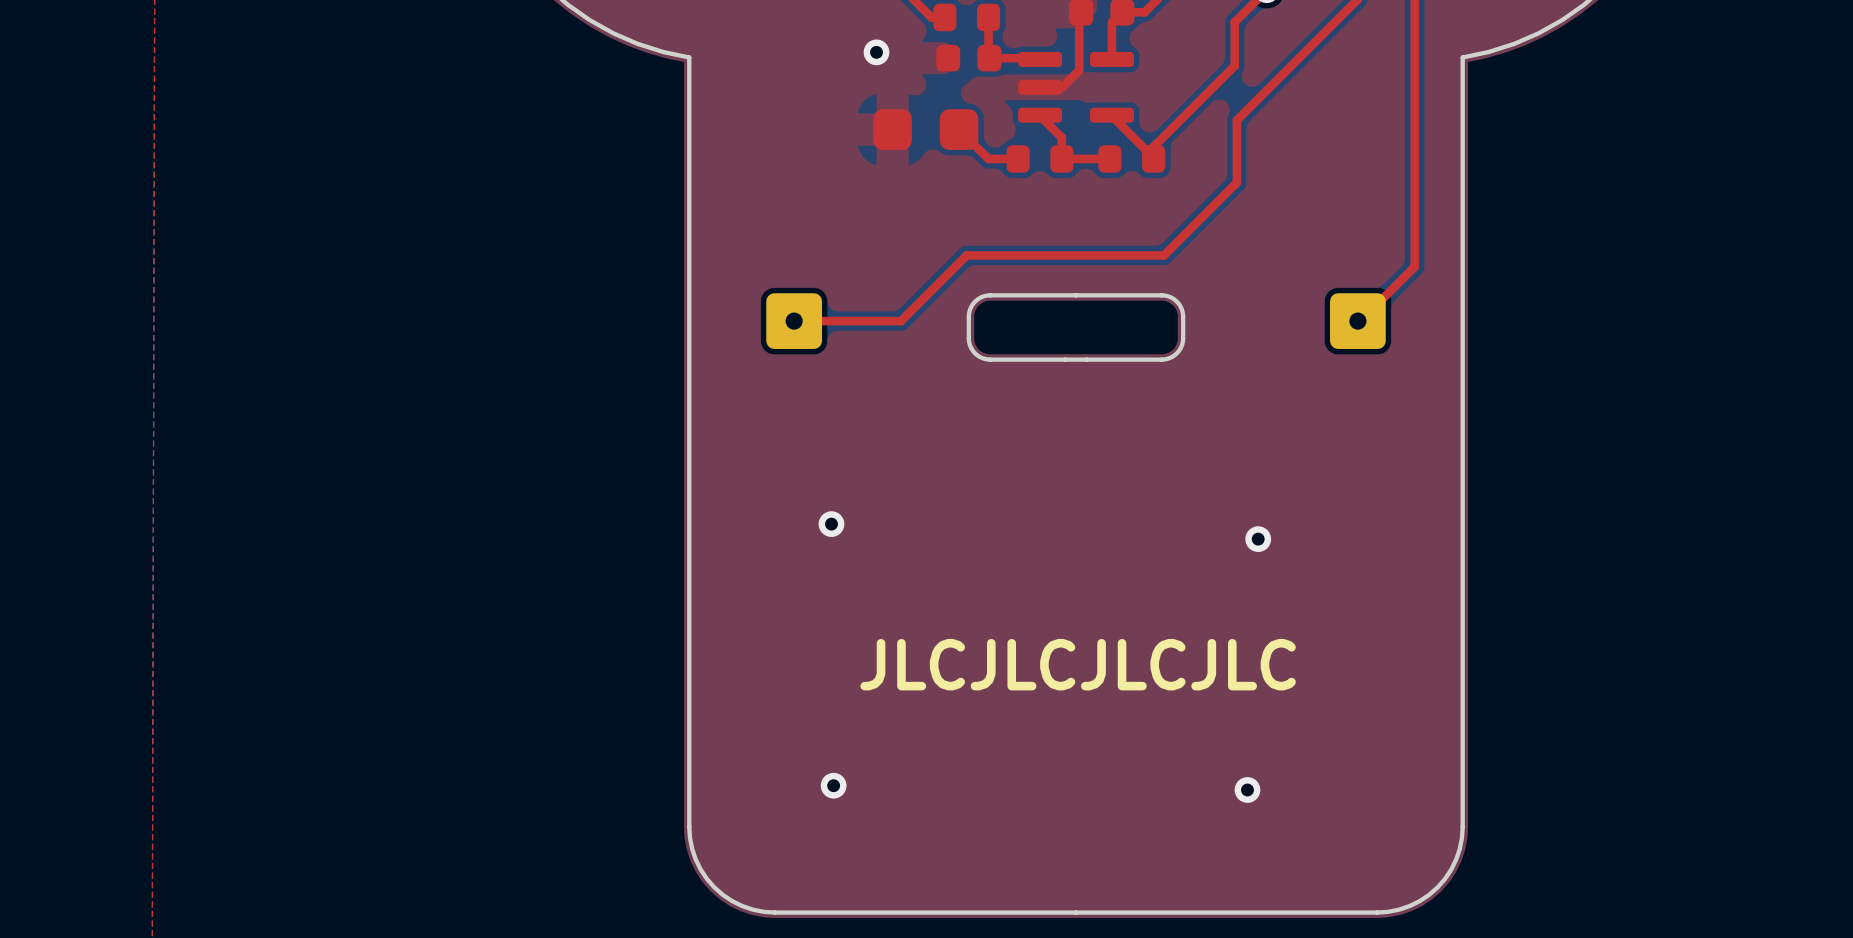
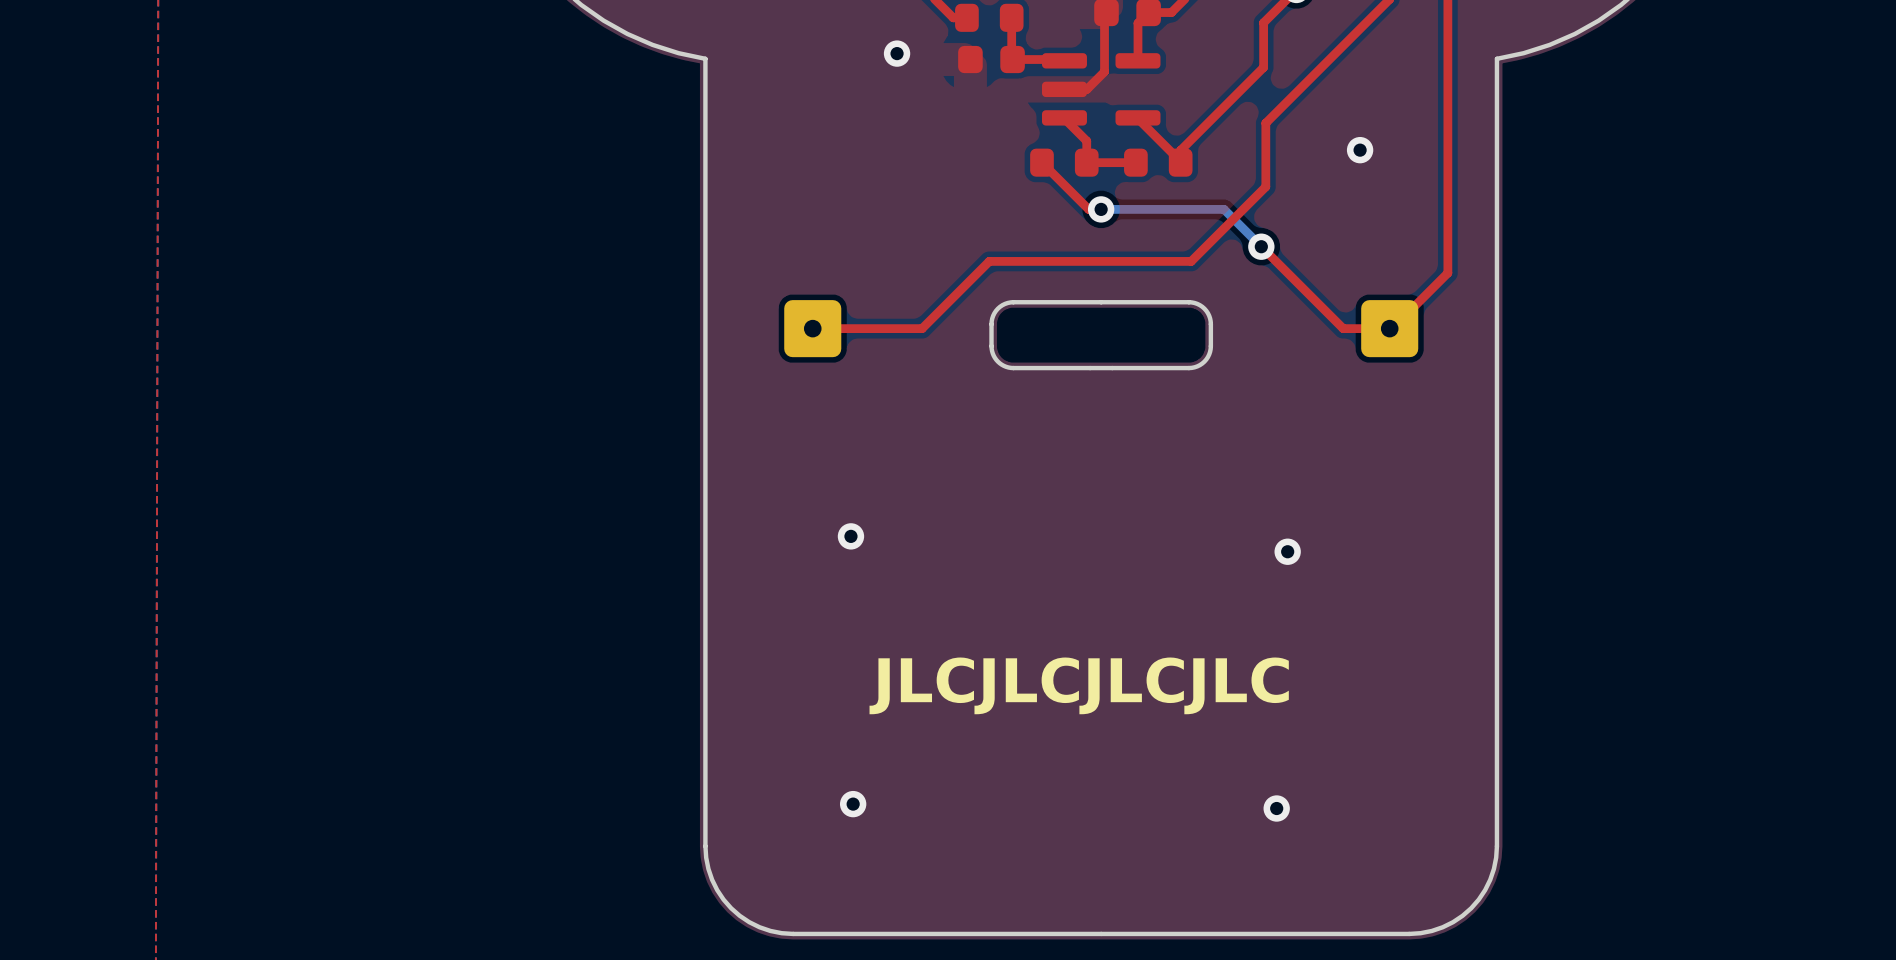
part: (925, 129) -> none
top track: (959, 129) (988, 158) (1018, 158) -> (1101, 209) (1088, 209) (1041, 162)
via: none -> (1360, 150)
bottom track: none -> (1101, 209) (1224, 209) (1261, 246)
via: none -> (1101, 209)
top track: none -> (1261, 246) (1343, 328) (1389, 328)
via: none -> (1261, 246)

